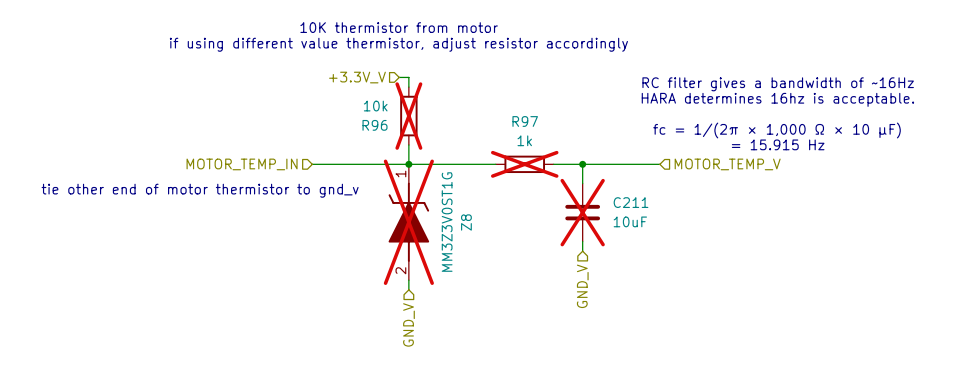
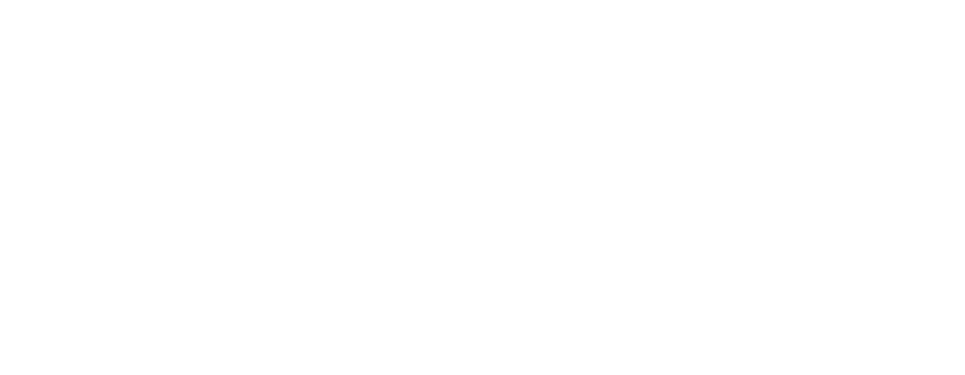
text: 10K thermistor from motor (399, 27) -> none
text: if using different value thermistor, adjust resistor accordingly (398, 44) -> none
hierarchical label: +3.3V_V (357, 77) -> none
wire: (399, 77) (408, 77) (408, 87) -> none
text: RC filter gives a bandwidth of ~16Hz (778, 84) -> none
text: HARA determines 16hz is acceptable. (777, 99) -> none
R96: 10k (408, 116) -> none
text: fc = 1/(2π × 1,000 Ω × 10 μF) (777, 130) -> none
text: = 15.915 Hz (778, 144) -> none
wire: (408, 145) (408, 164) -> none
hierarchical label: MOTOR_TEMP_IN (242, 164) -> none
wire: (312, 164) (495, 164) -> none
junction: (408, 164) -> none
R97: 1k (524, 164) -> none
wire: (553, 164) (659, 164) -> none
wire: (582, 164) (582, 183) -> none
junction: (582, 164) -> none
hierarchical label: MOTOR_TEMP_V (727, 164) -> none
text: tie other end of motor thermistor to gnd_v (200, 190) -> none
C211: 10uF (582, 212) -> none
Z8: MM3Z3V0ST1G (408, 222) -> none
wire: (582, 241) (582, 251) -> none
wire: (408, 280) (408, 289) -> none
hierarchical label: GND_V (582, 286) -> none
hierarchical label: GND_V (408, 324) -> none

